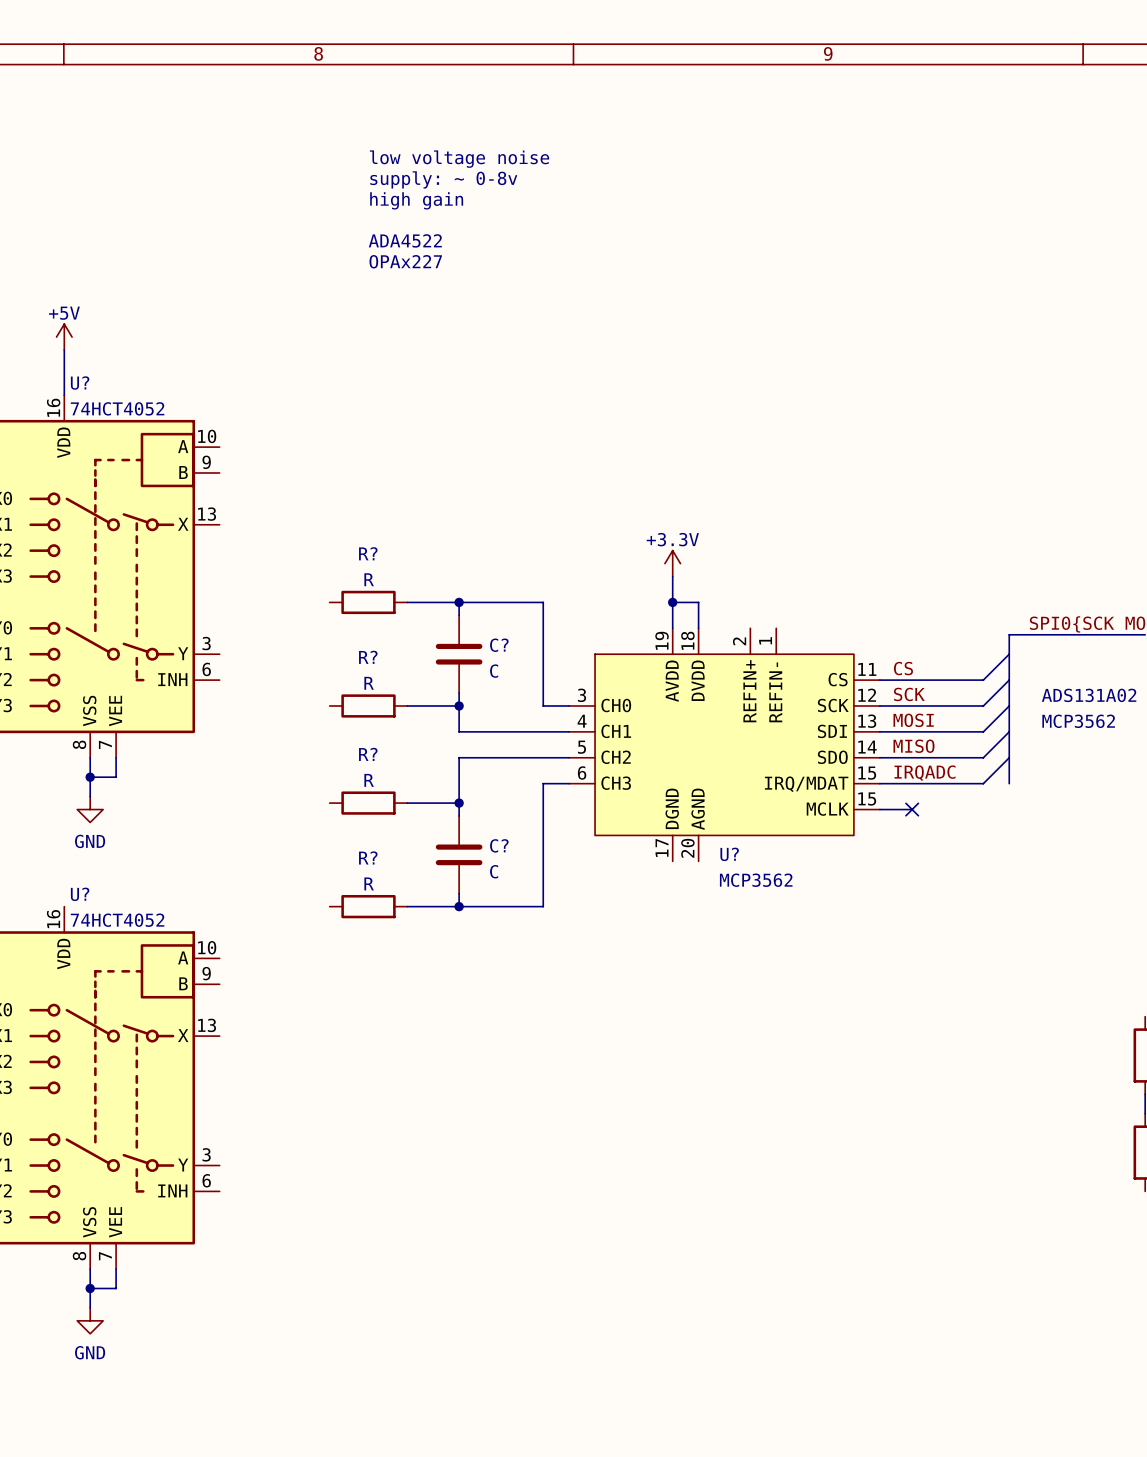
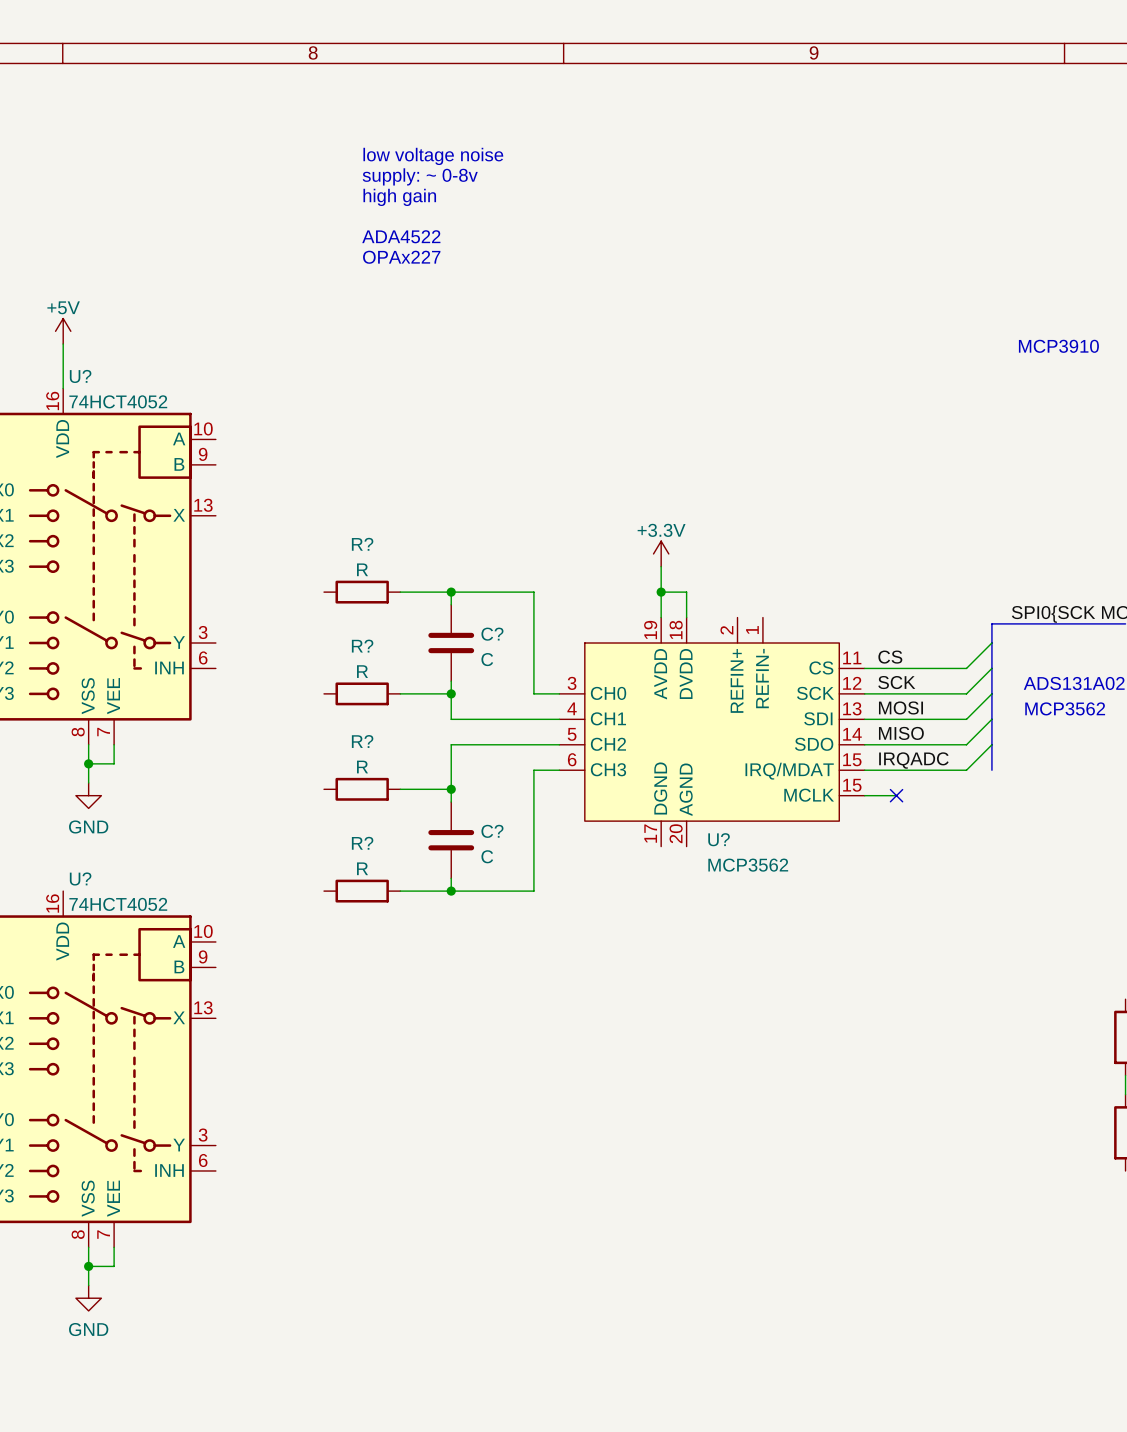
text: none -> MCP3910 (1058, 346)

